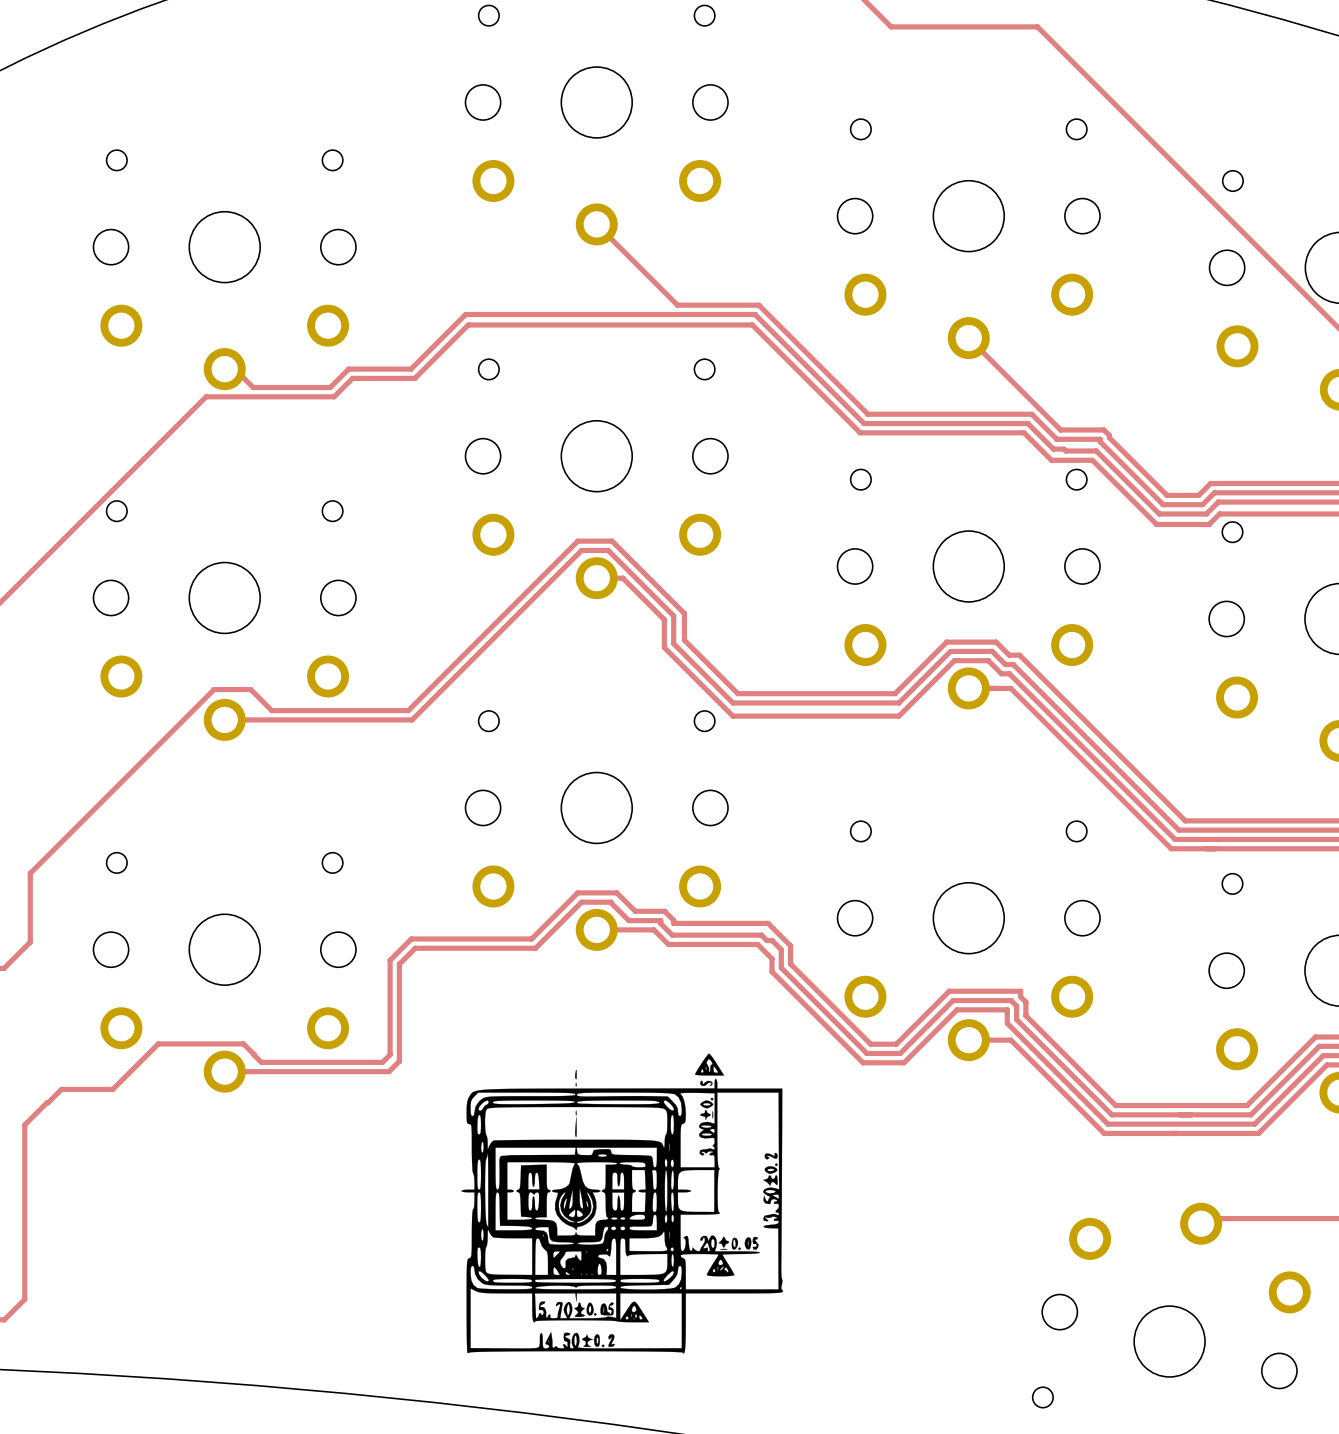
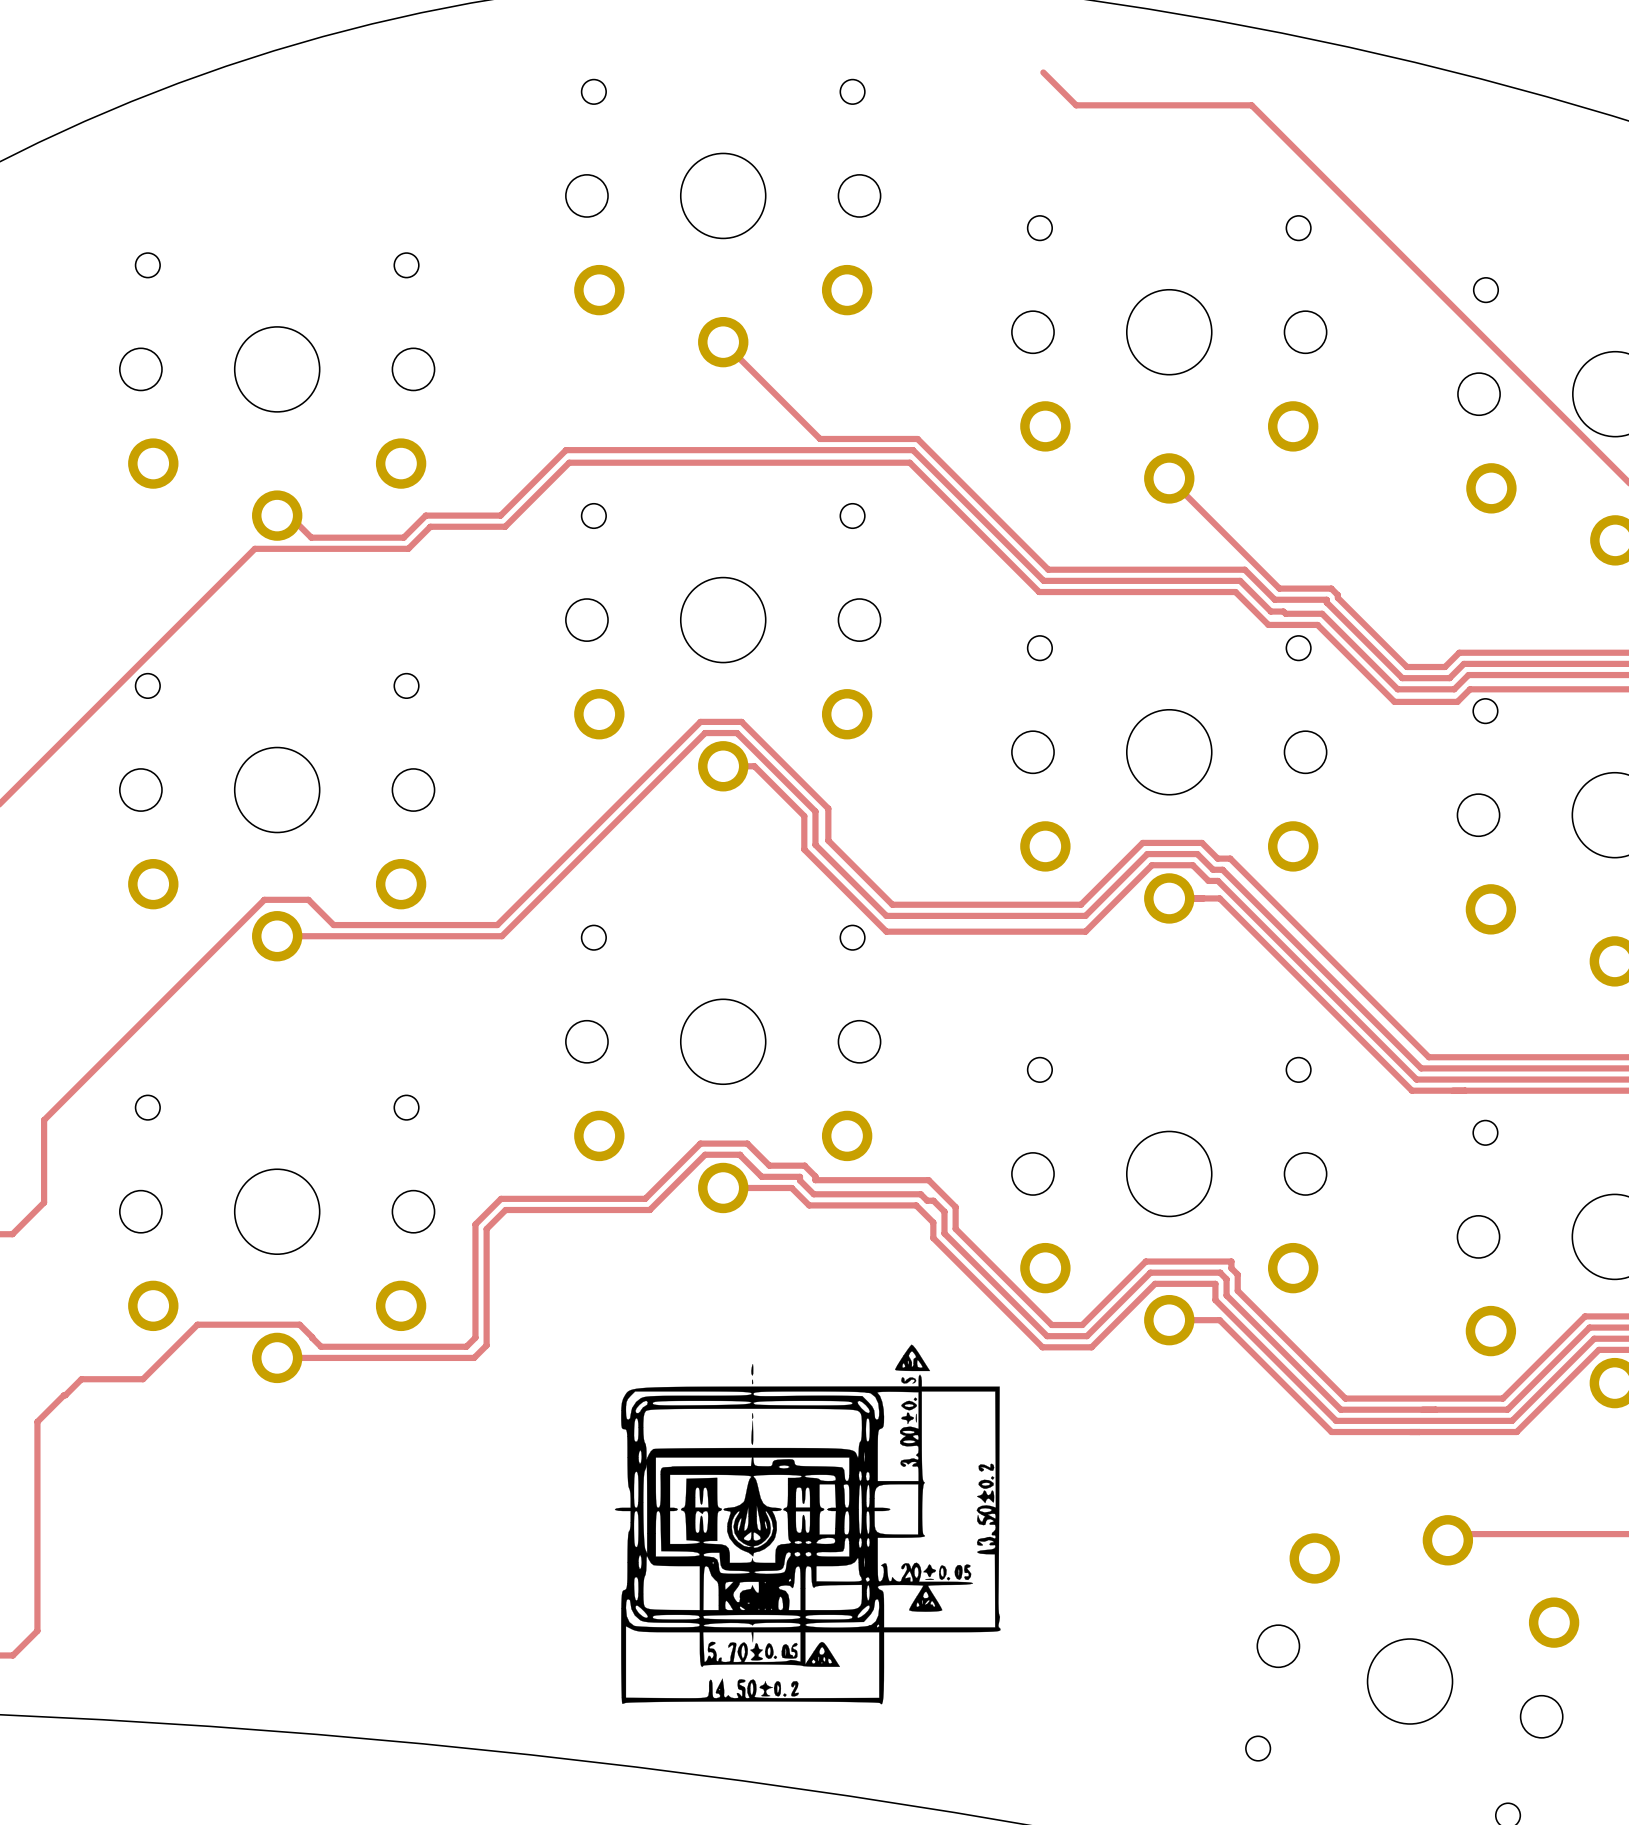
drawing position: (622, 1203) -> (807, 1524)

